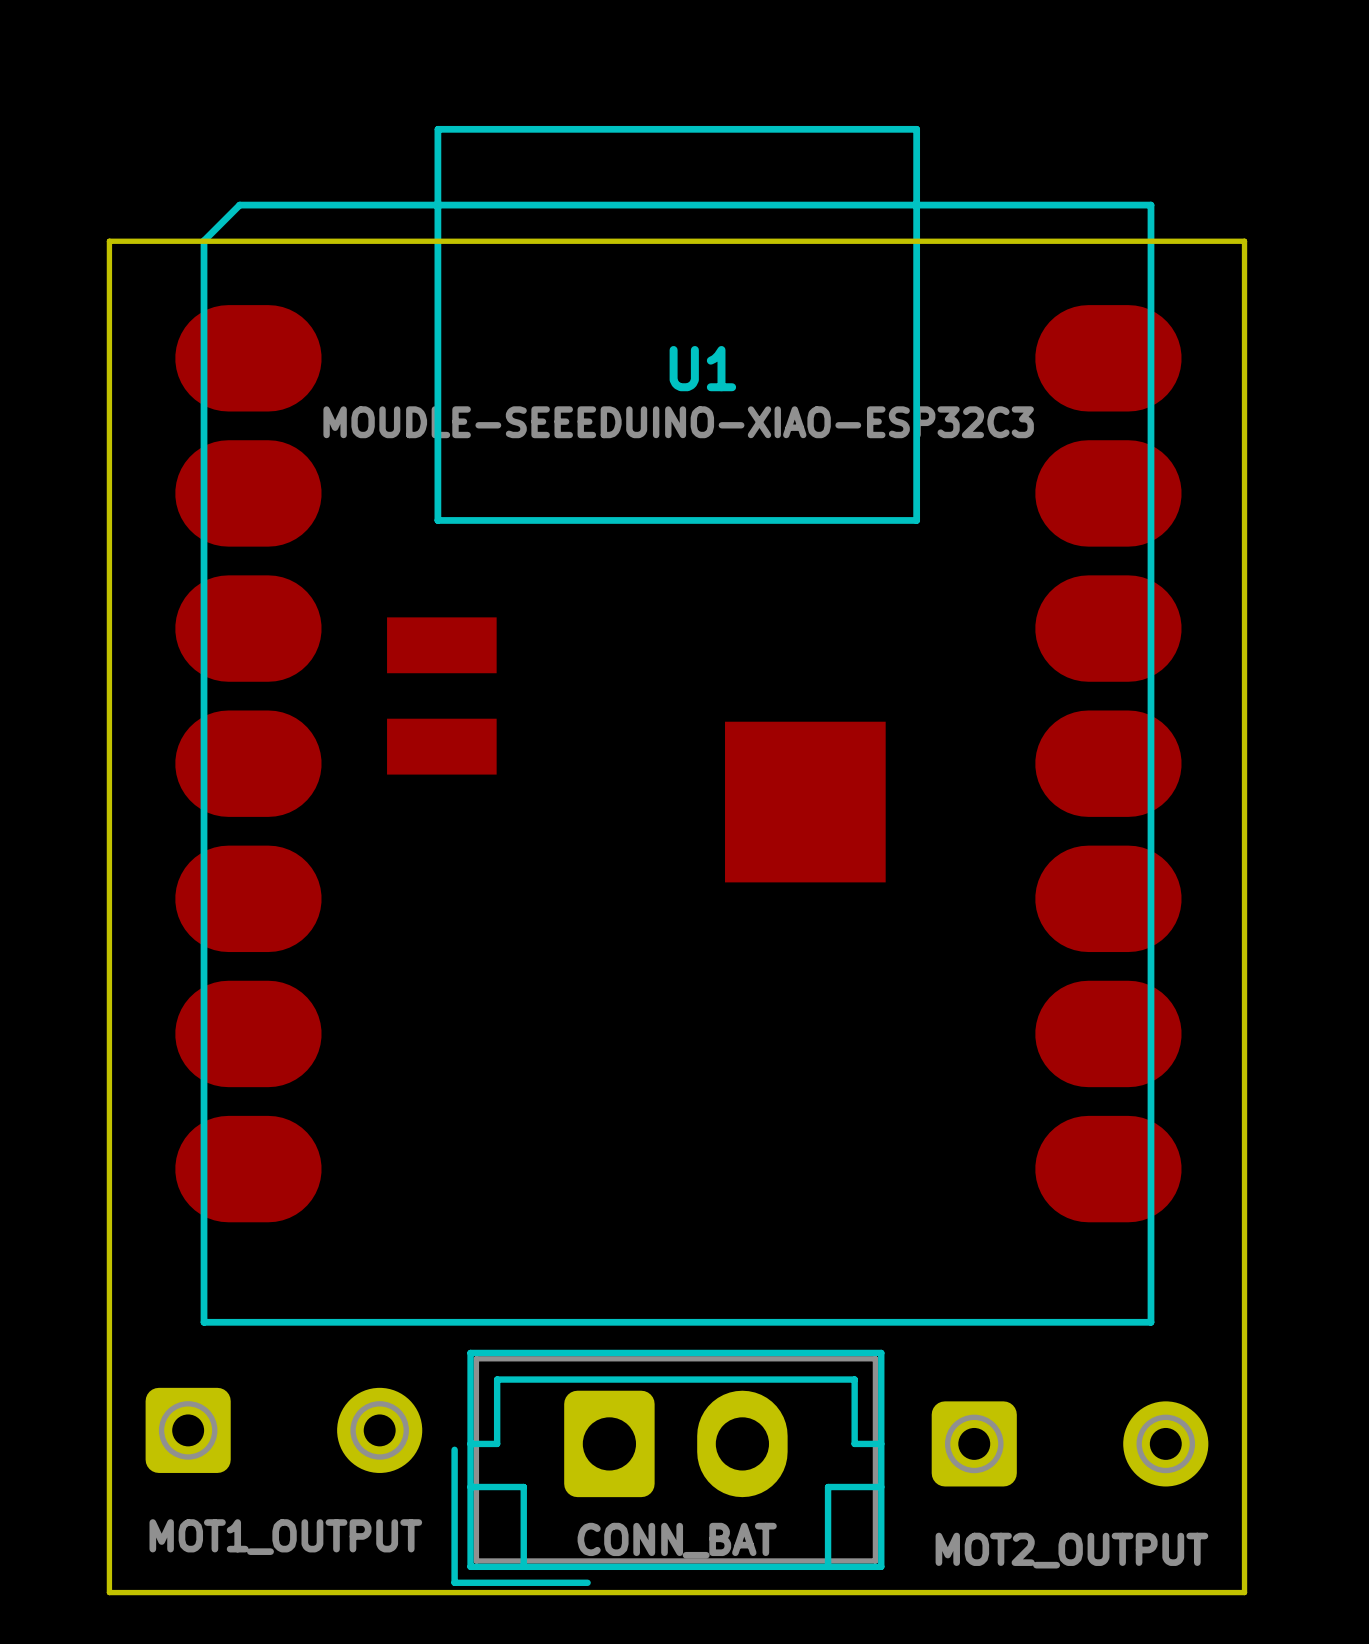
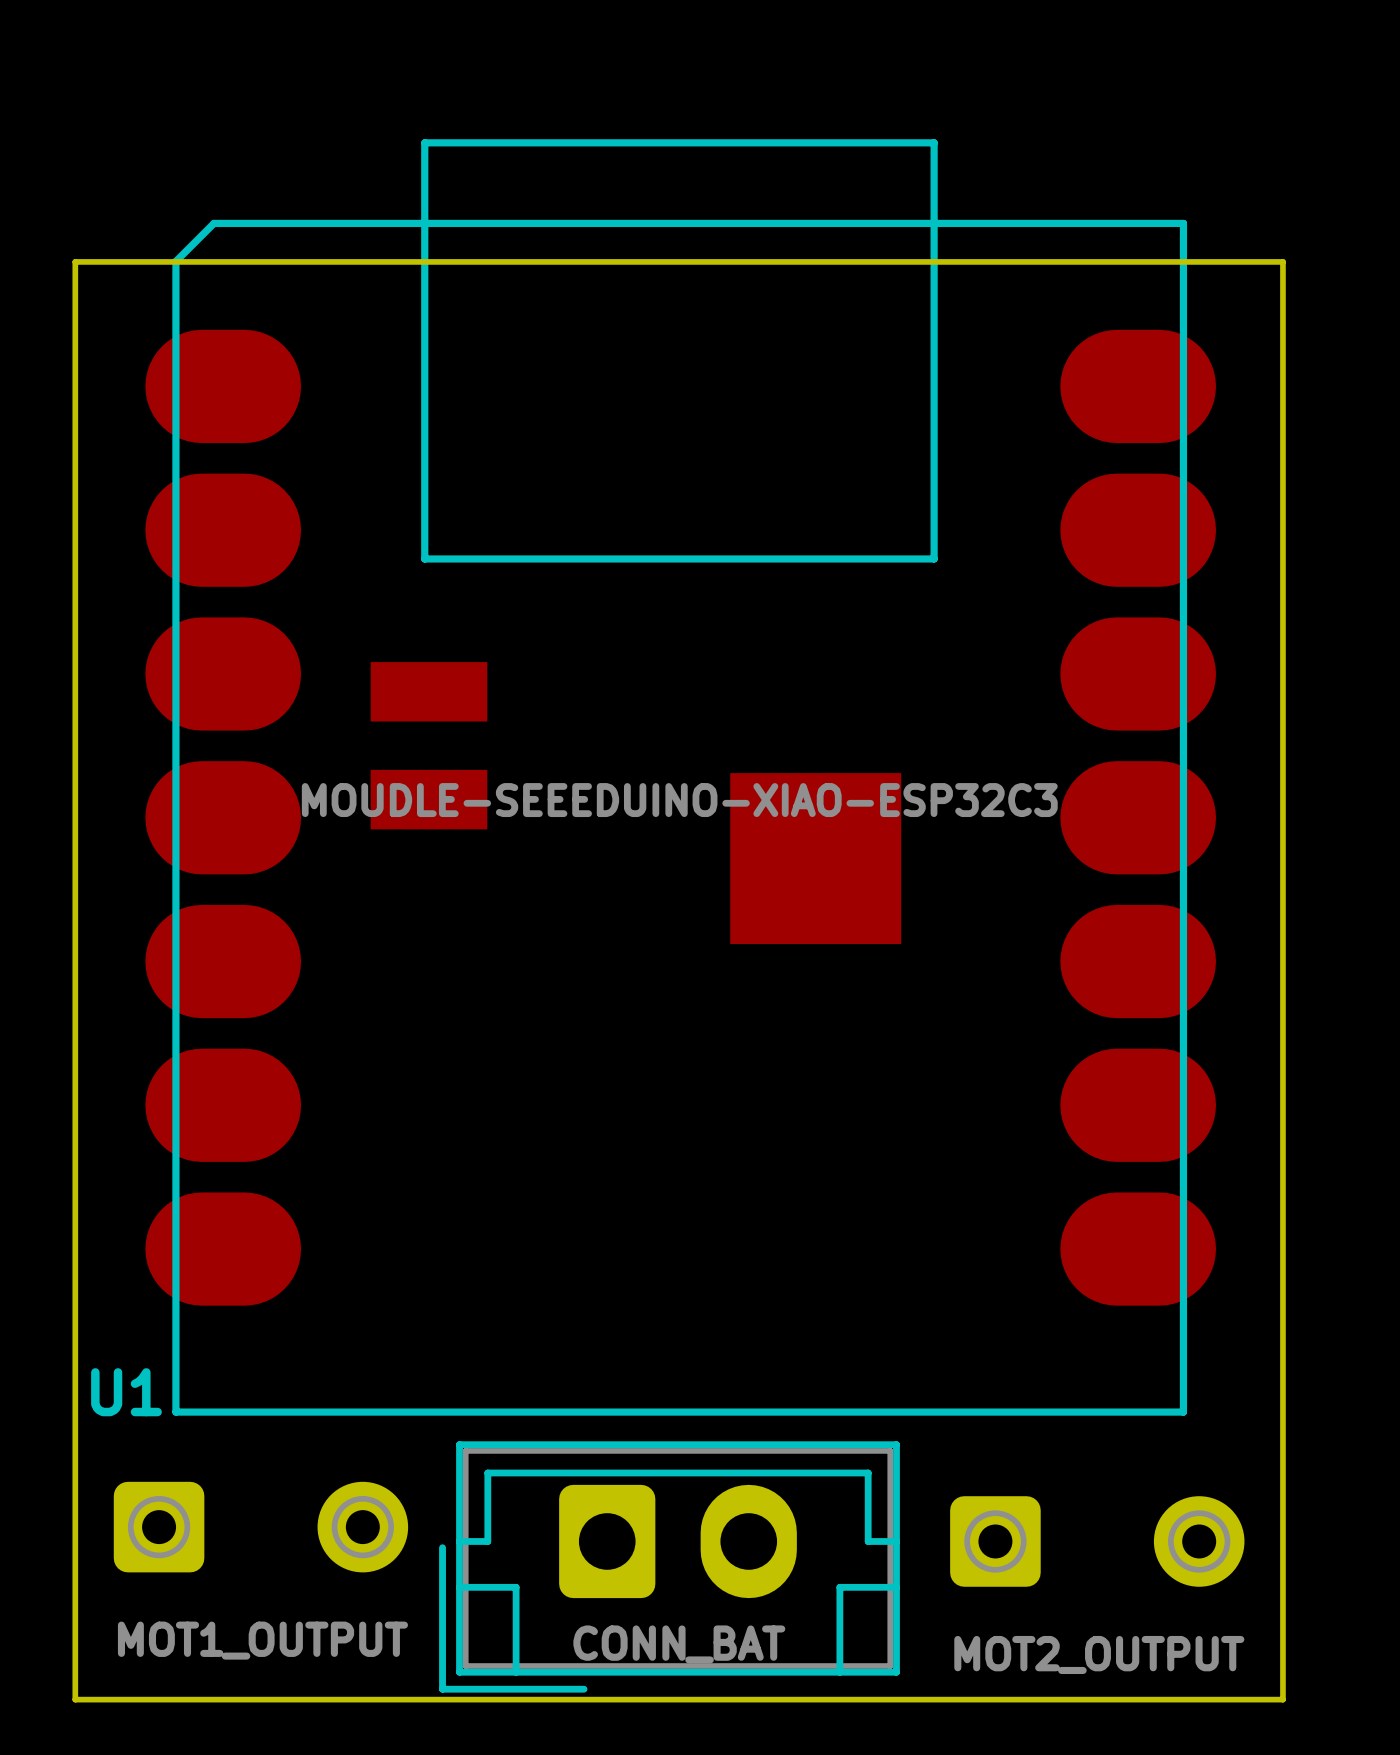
U1 name position: U1 (702, 368) -> U1 (126, 1392)
U1 value position: MOUDLE-SEEEDUINO-XIAO-ESP32C3 (678, 422) -> MOUDLE-SEEEDUINO-XIAO-ESP32C3 (679, 800)

